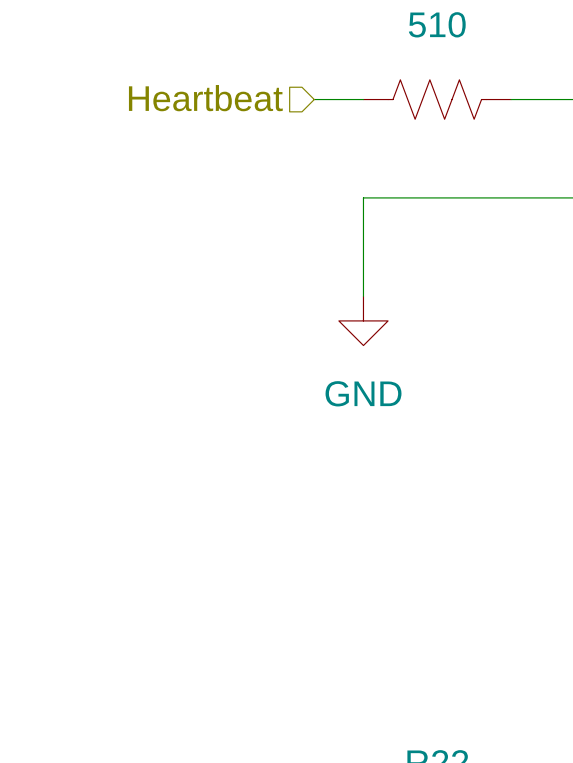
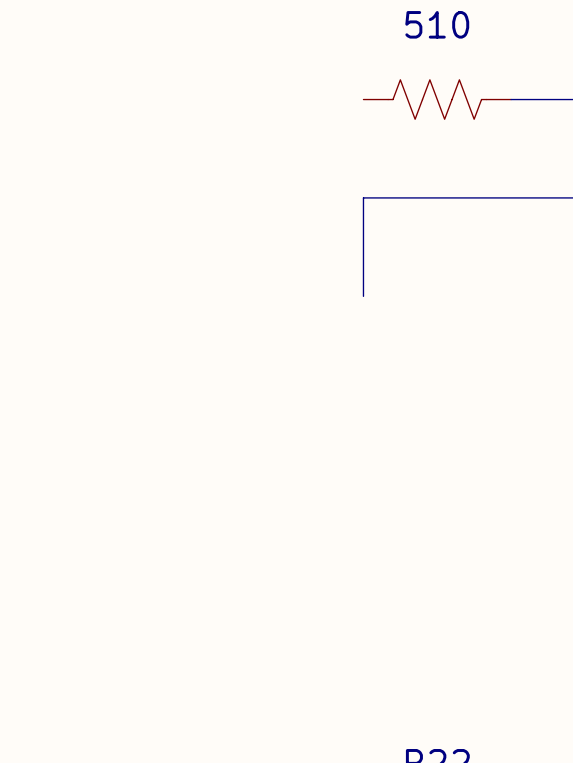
hierarchical label: Heartbeat (205, 98) -> none
wire: (314, 99) (363, 99) -> none
power symbol: GND (363, 320) -> none

